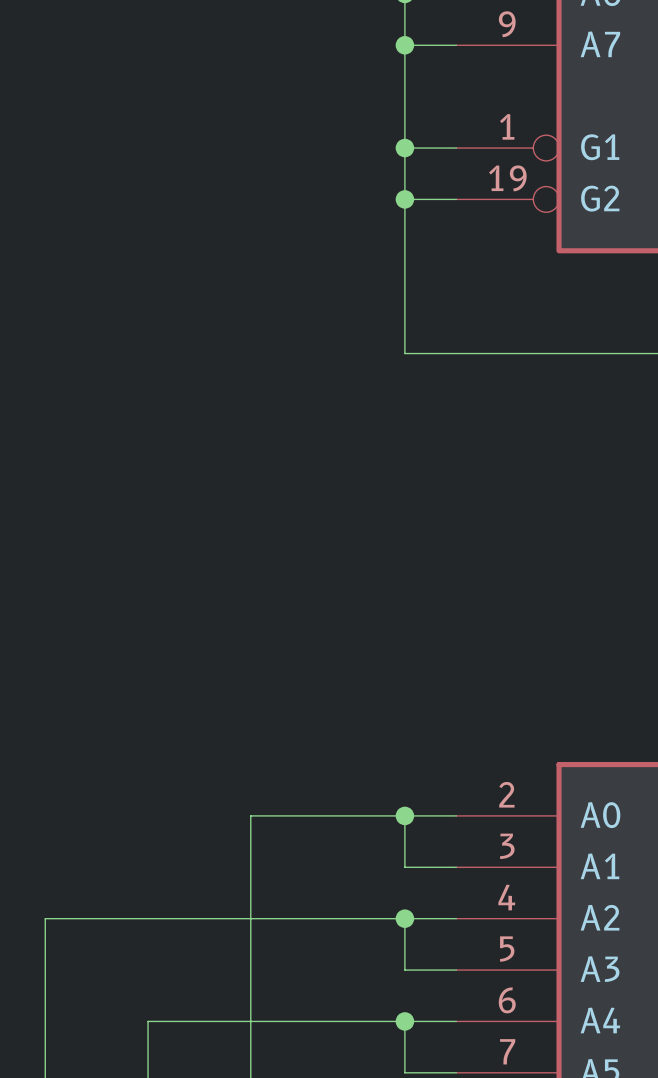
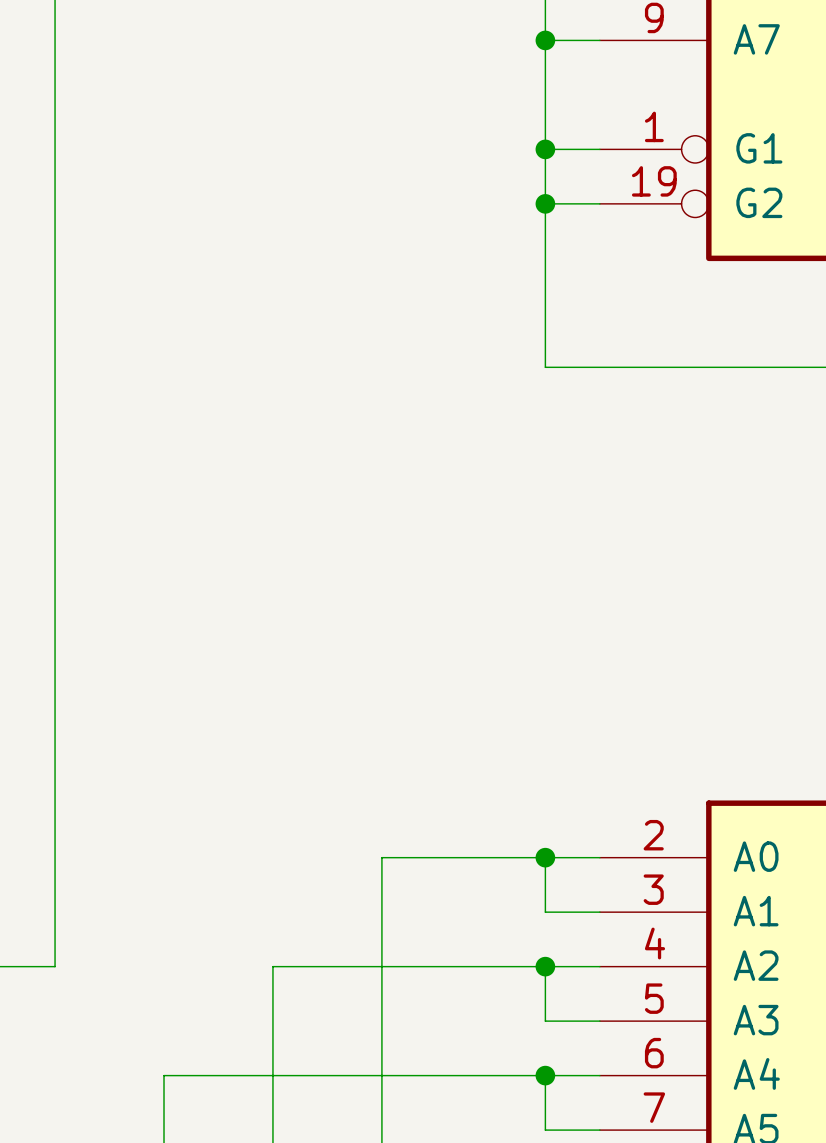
wire: (148, 918) (45, 918) (45, 1021) -> (272, 966) (272, 1075) (164, 1075)

